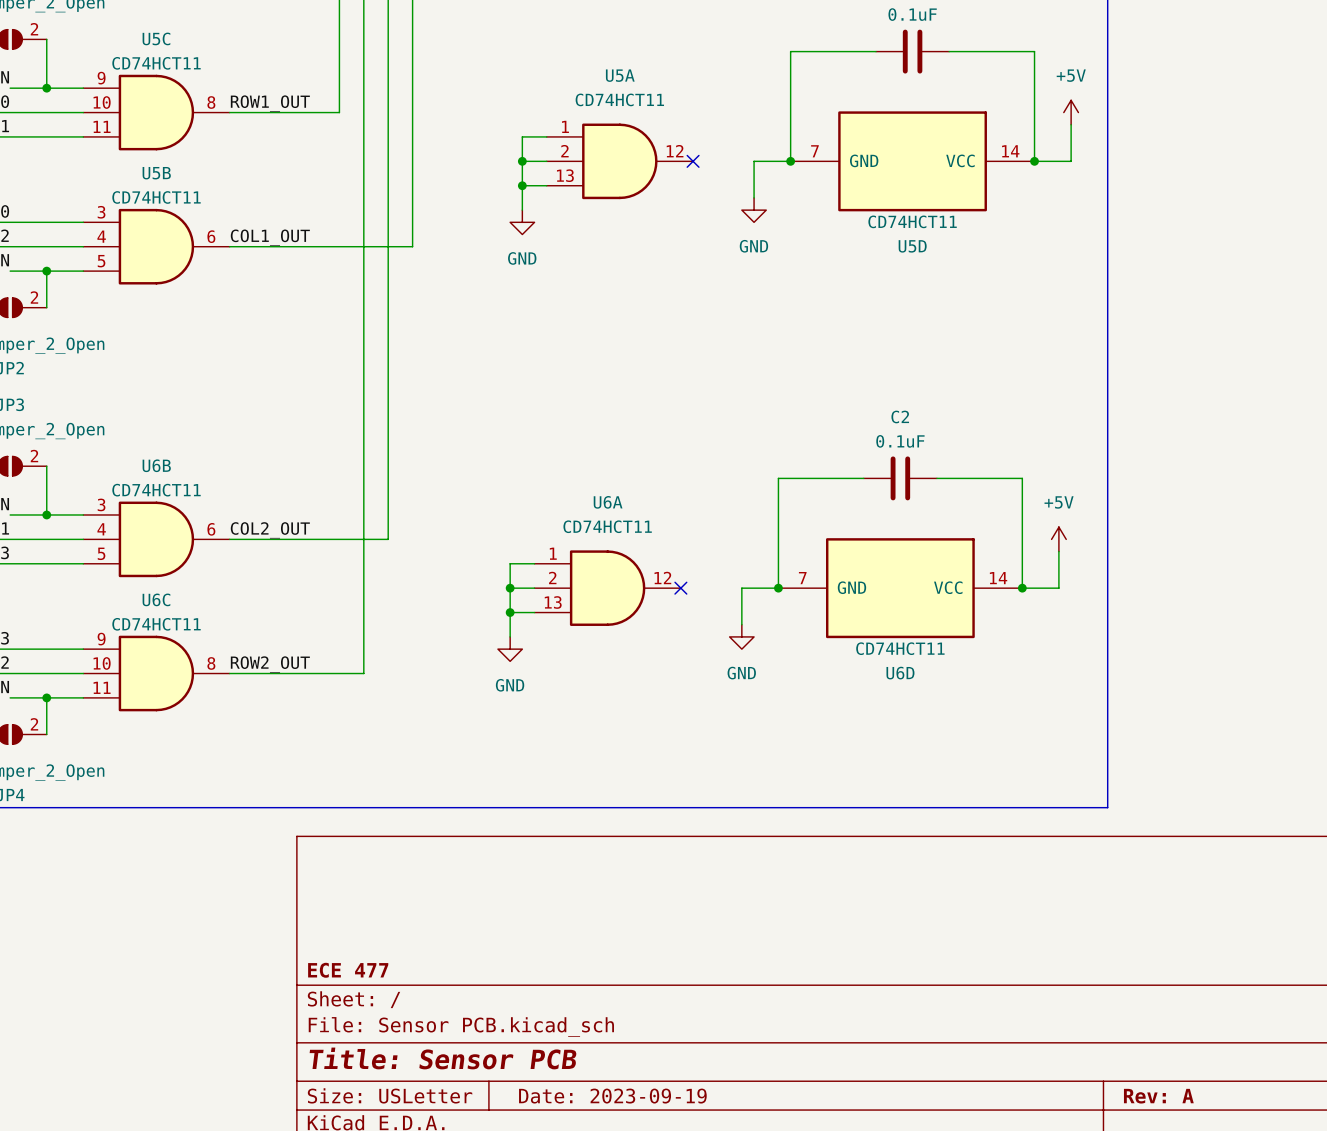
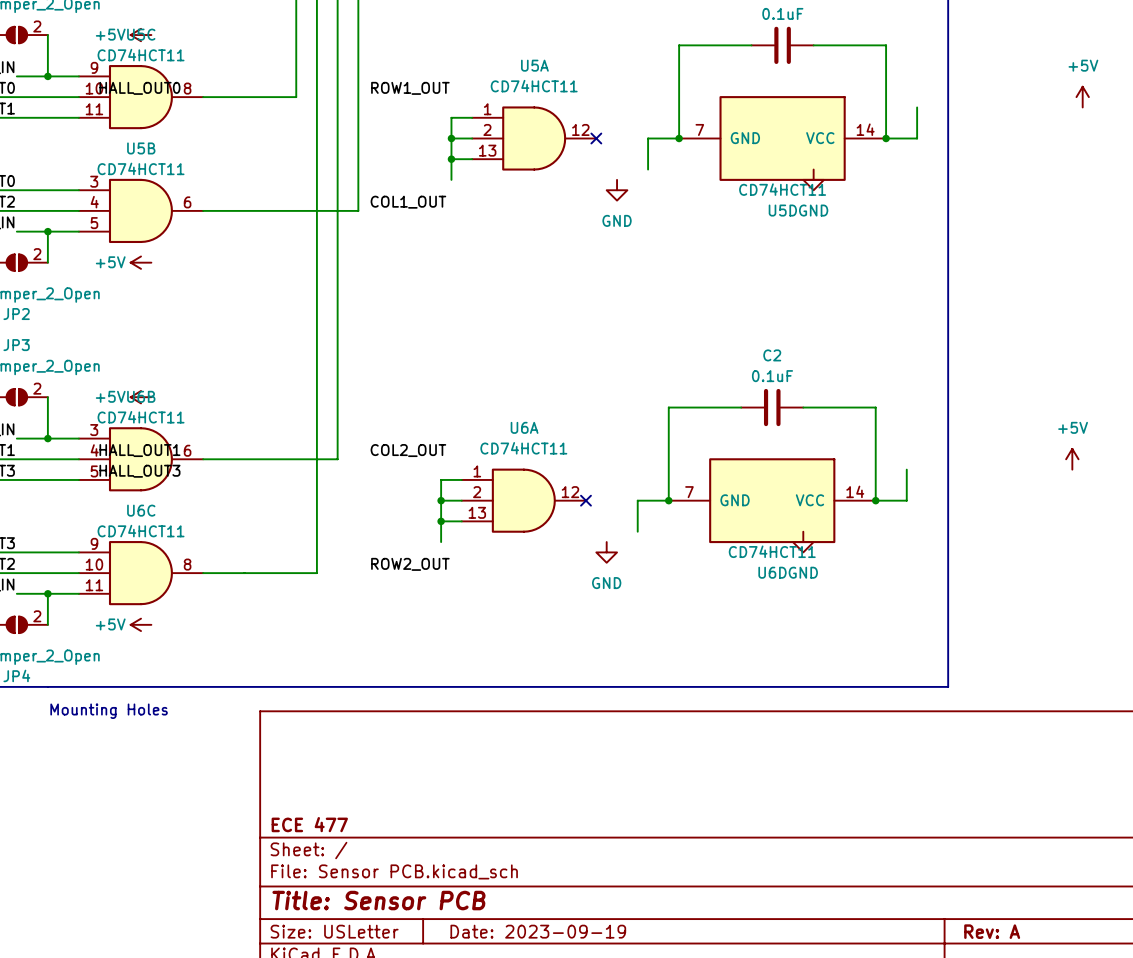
power symbol: none -> +5V (141, 35)
label: none -> HALL_OUT0 (139, 88)
label position: ROW1_OUT (270, 103) -> ROW1_OUT (410, 88)
power symbol position: +5V (1071, 112) -> +5V (1082, 97)
power symbol position: GND (754, 210) -> GND (617, 190)
power symbol: none -> GND (813, 179)
power symbol: GND (522, 222) -> none
label position: COL1_OUT (270, 237) -> COL1_OUT (408, 202)
power symbol: none -> +5V (141, 262)
power symbol: none -> +5V (141, 397)
label: none -> HALL_OUT1 (139, 450)
label position: COL2_OUT (270, 530) -> COL2_OUT (408, 450)
power symbol position: +5V (1058, 539) -> +5V (1072, 459)
label: none -> HALL_OUT3 (139, 471)
power symbol position: GND (741, 636) -> GND (606, 552)
power symbol: none -> GND (803, 542)
power symbol: GND (510, 649) -> none
label position: ROW2_OUT (270, 664) -> ROW2_OUT (410, 564)
power symbol: none -> +5V (141, 624)
text: none -> Mounting Holes (109, 711)

